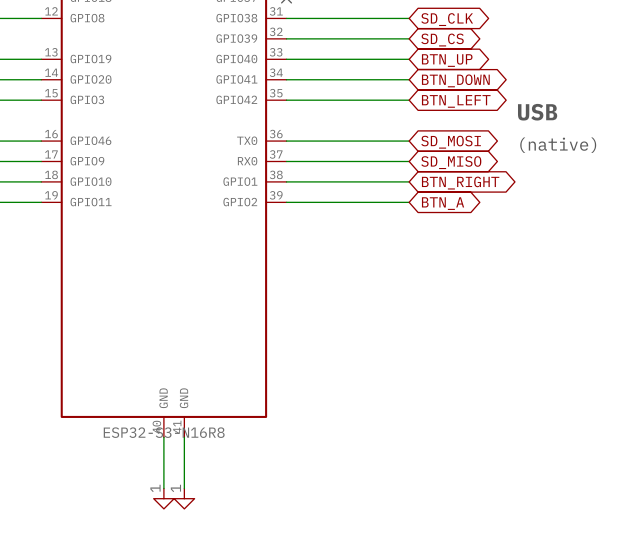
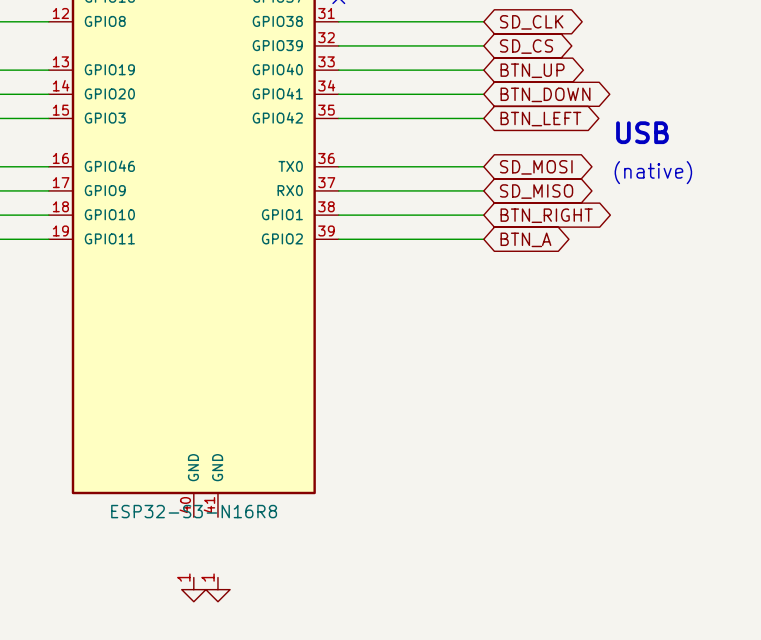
wire: (163, 437) (163, 488) -> none
wire: (184, 437) (184, 488) -> none

